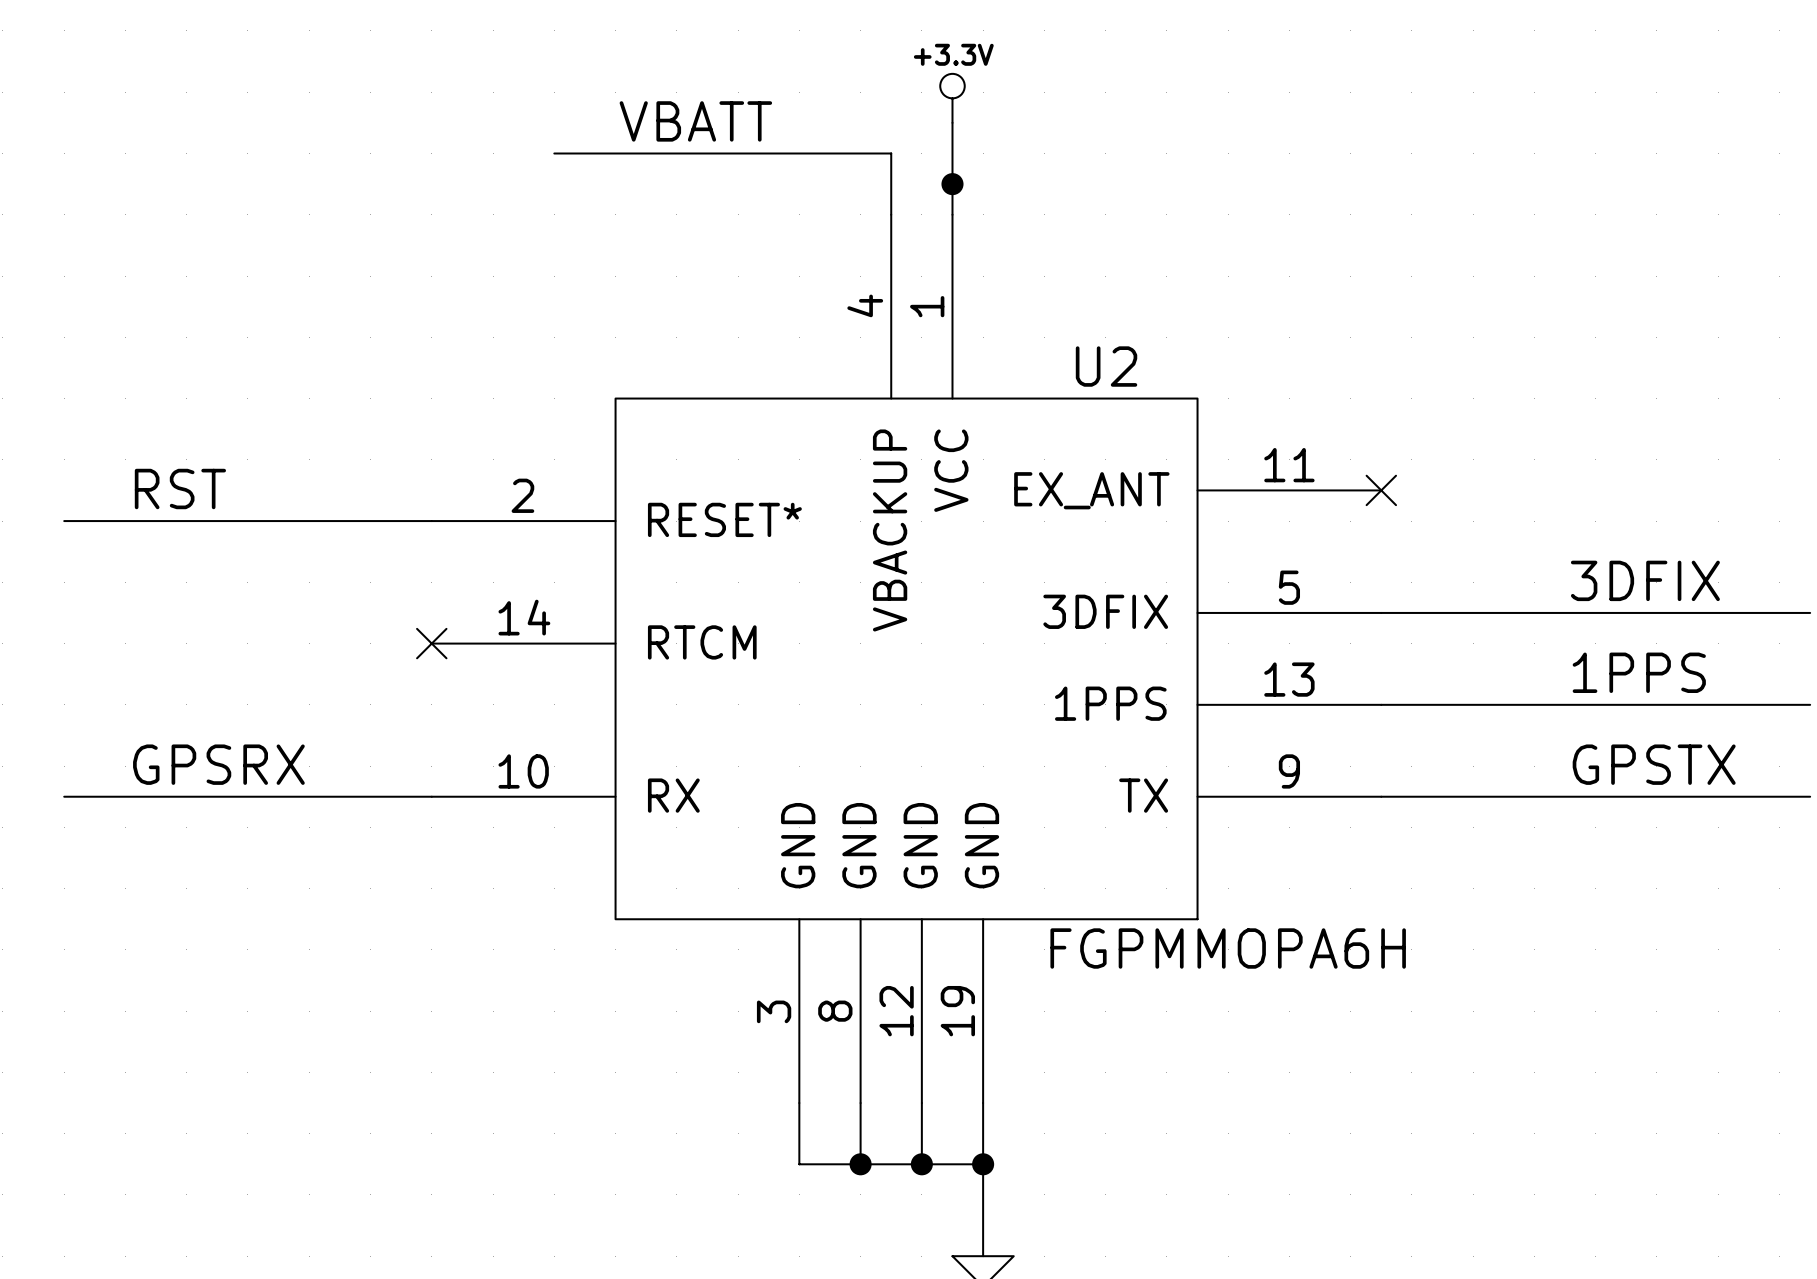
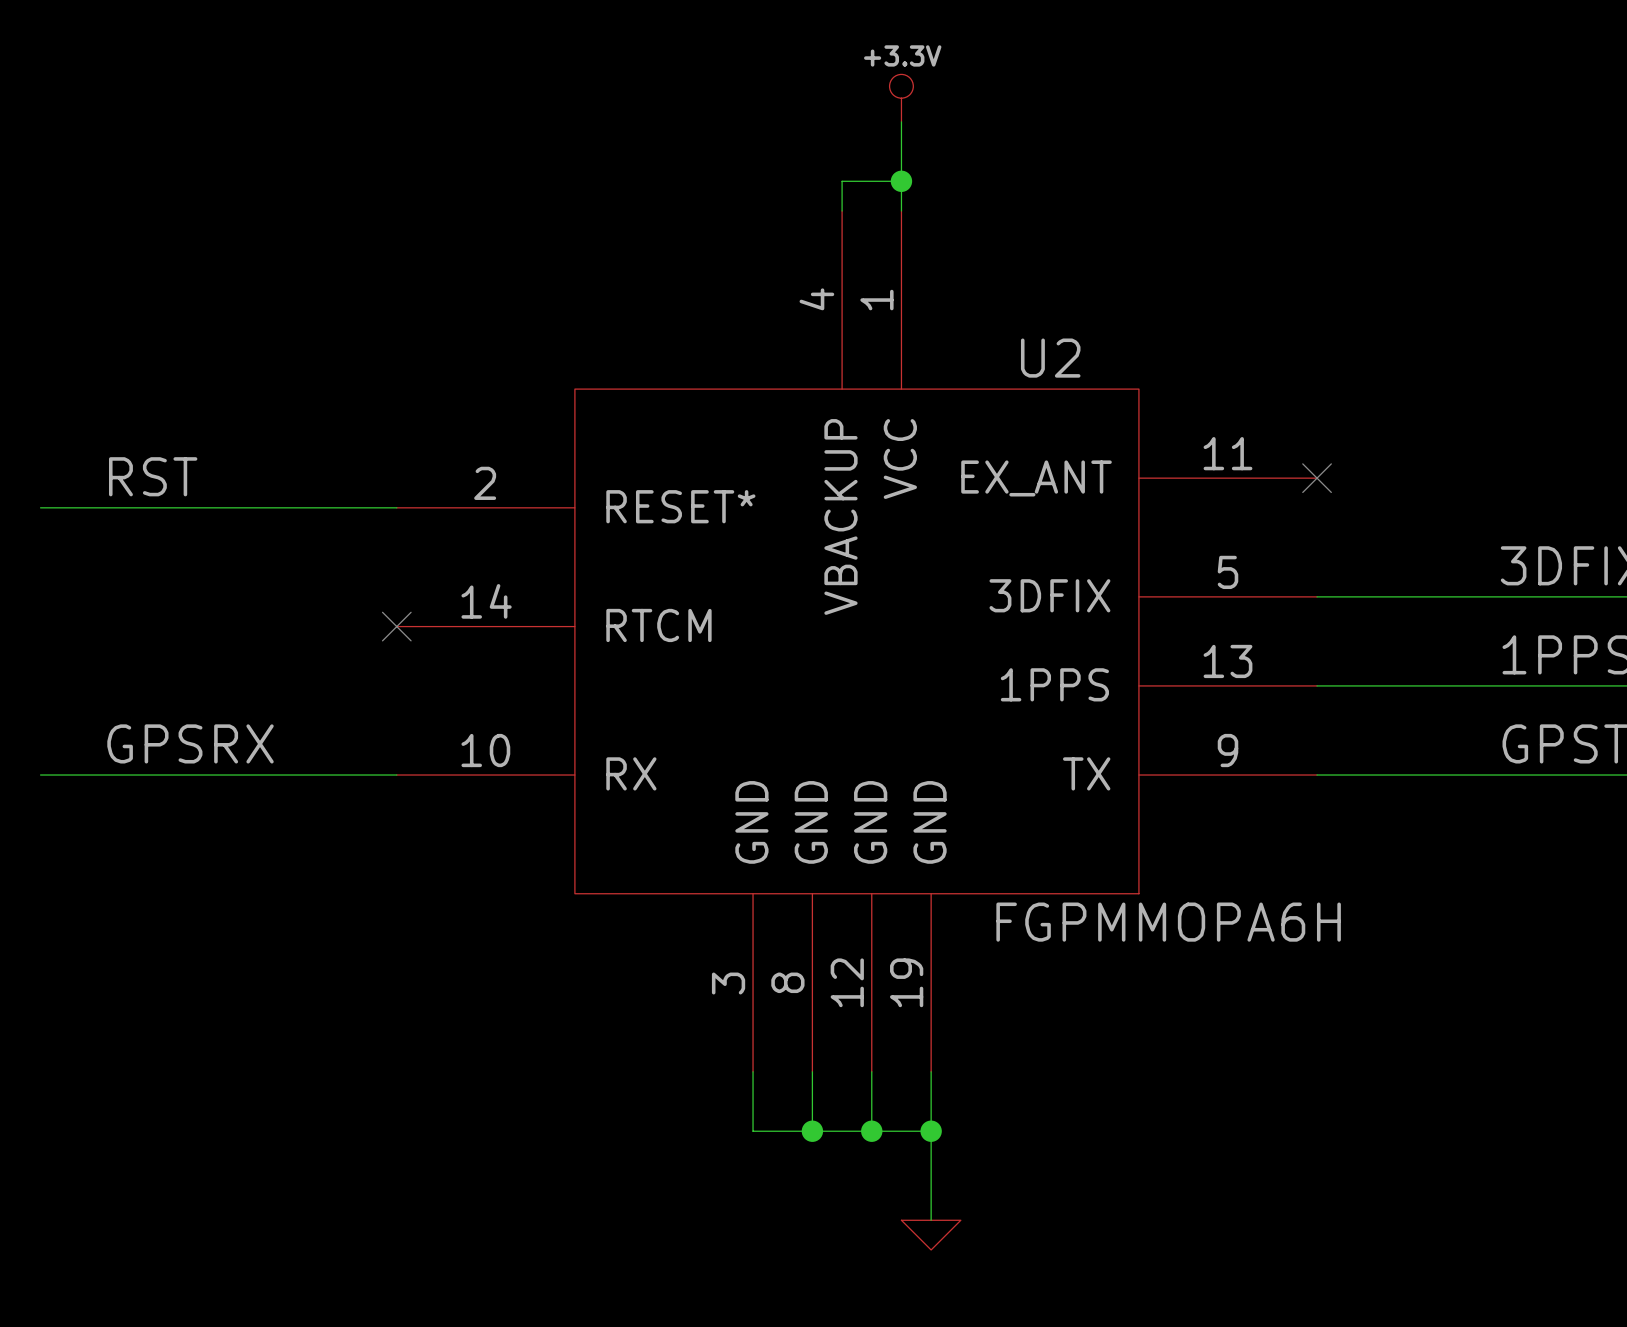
label: VBATT (695, 121) -> none
wire: (554, 153) (891, 153) (891, 184) -> (901, 181) (842, 181)

